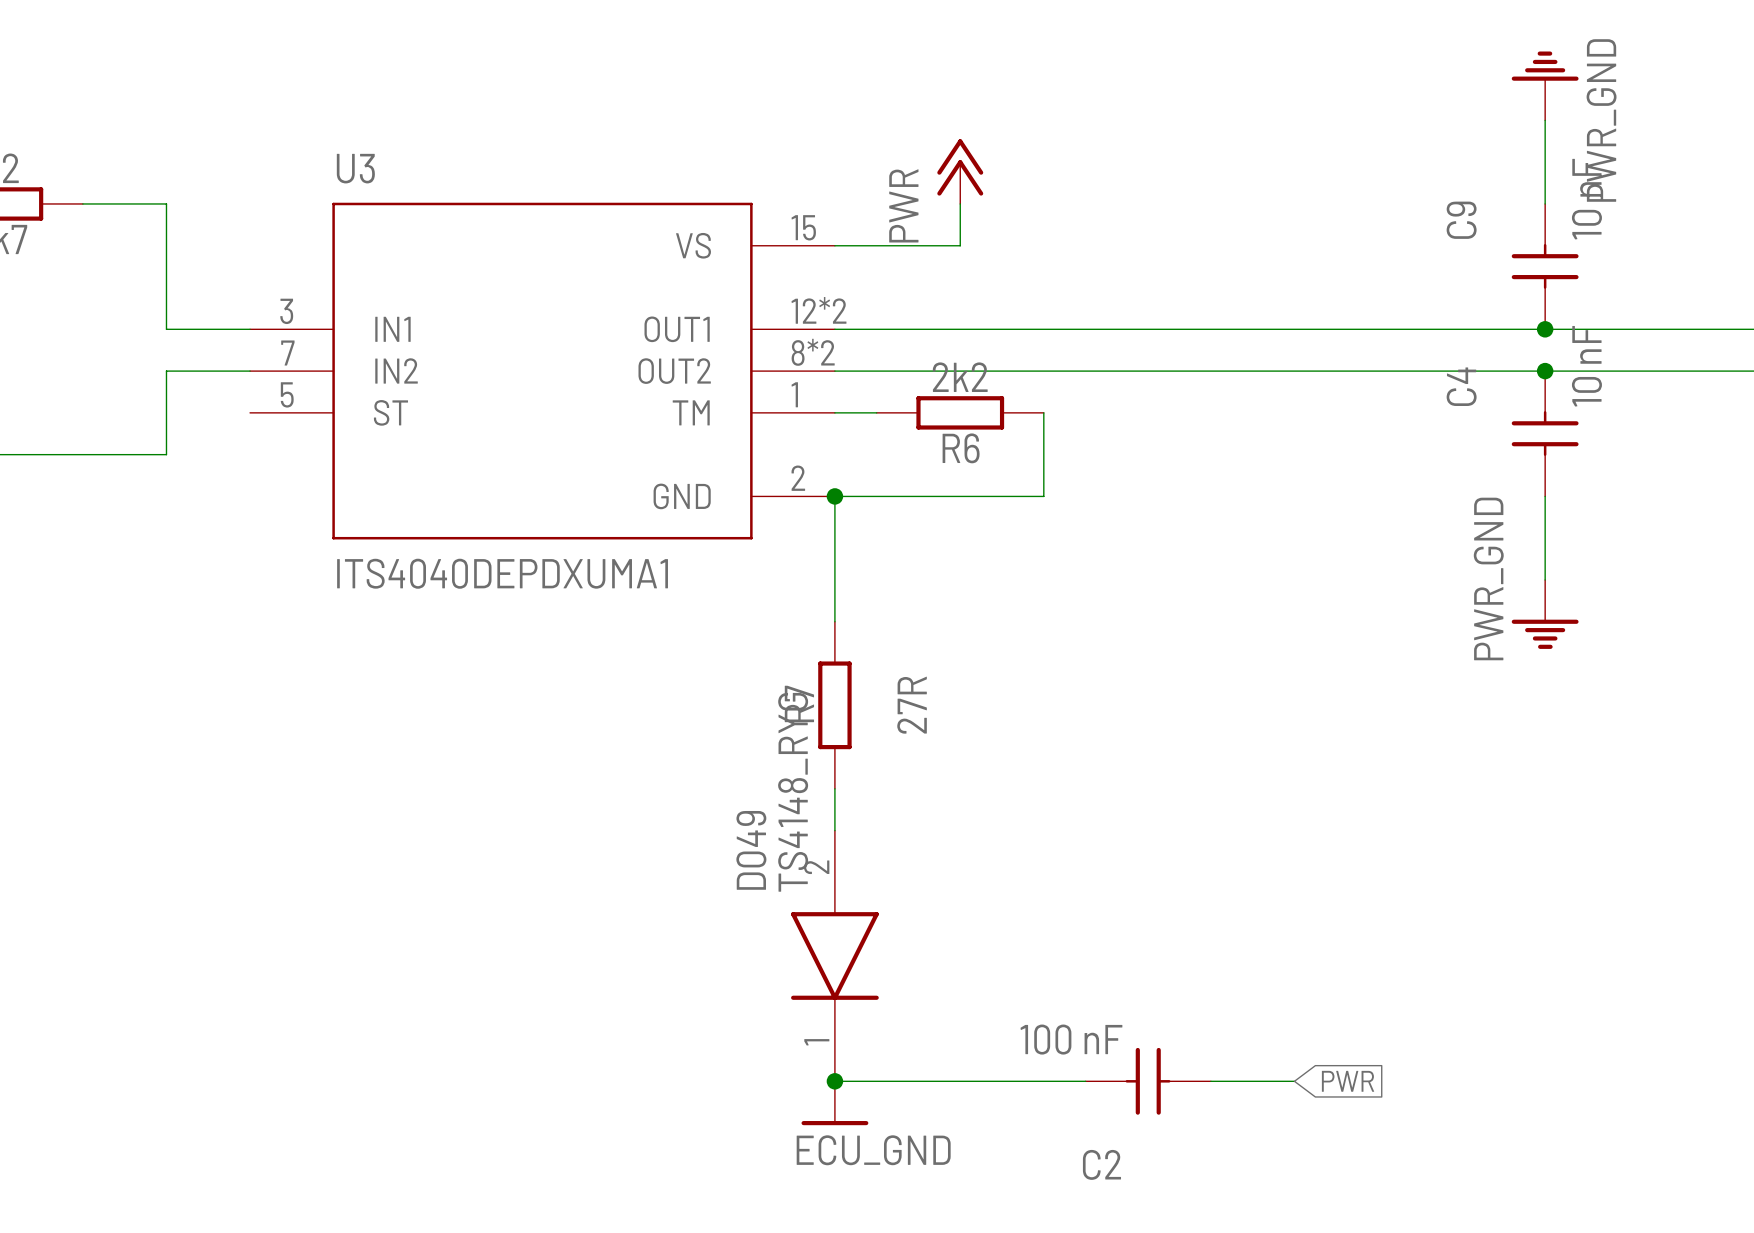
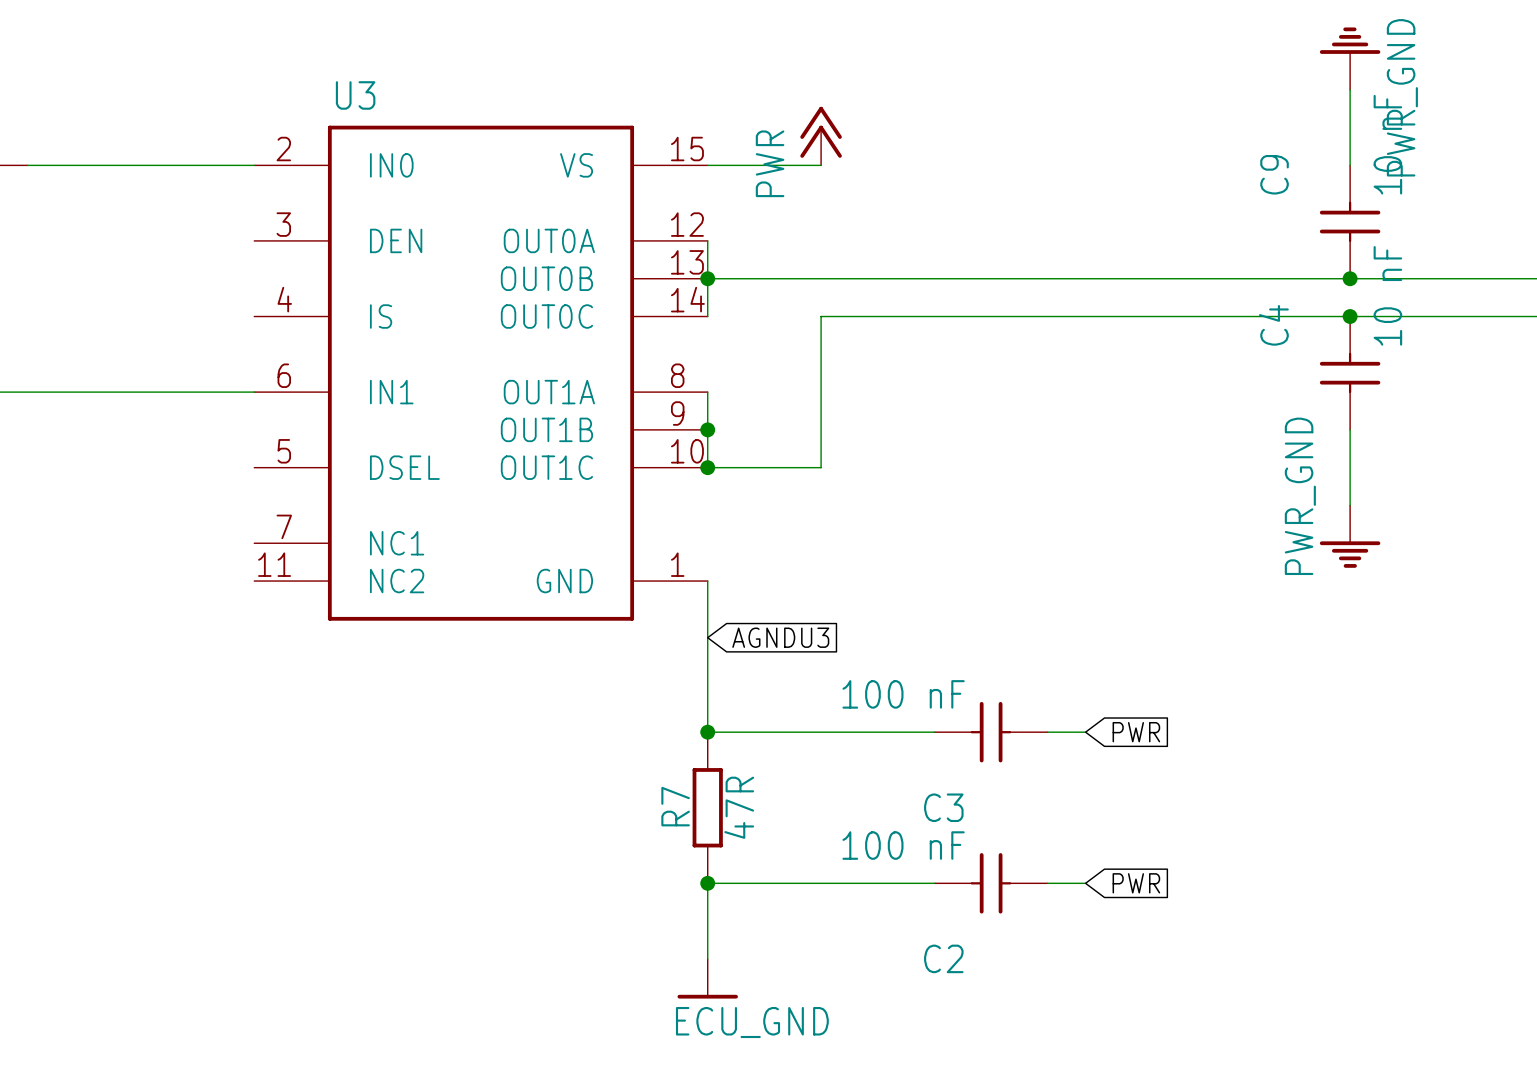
U3 name position: U3 (355, 168) -> U3 (355, 95)
U3 symbol: [250, 202, 835, 540] -> [254, 125, 708, 621]
wire: (166, 203) (166, 329) (250, 329) -> (103, 165) (254, 165)
wire: (960, 203) (960, 245) (834, 245) -> (821, 165) (707, 165)
junction: none -> (707, 278)
wire: (250, 371) (166, 371) (166, 454) -> (254, 392) (103, 392)
wire: (834, 371) (960, 371) -> (707, 316) (707, 240)
wire: (834, 412) (876, 412) -> none
R6: 2k2 (960, 412) -> none
wire: (1043, 412) (1043, 496) (834, 496) -> (707, 392) (707, 429)
wire: (834, 538) (834, 621) -> (707, 467) (821, 467) (821, 316)
junction: none -> (707, 467)
U3 value: ITS4040DEPDXUMA1 (502, 573) -> none
wire: none -> (707, 581) (707, 694)
R7 position: (834, 705) -> (707, 807)
R7 value: 27R (912, 705) -> 47R (739, 807)
global label: none -> AGNDU3 (780, 637)
wire: none -> (707, 732) (934, 732)
junction: none -> (707, 732)
C3: none -> 100 nF (991, 732)
wire: none -> (1047, 732) (1085, 732)
global label: none -> PWR (1136, 732)
D049: TS4148_RYG (834, 955) -> none
wire: none -> (1047, 883) (1085, 883)
wire: (834, 1081) (1085, 1081) -> (707, 958) (707, 883) (934, 883)
junction position: (834, 1081) -> (707, 883)
C2 position: (1148, 1081) -> (991, 883)
wire: (1210, 1081) (1294, 1081) -> none
global label position: PWR (1348, 1081) -> PWR (1136, 883)

